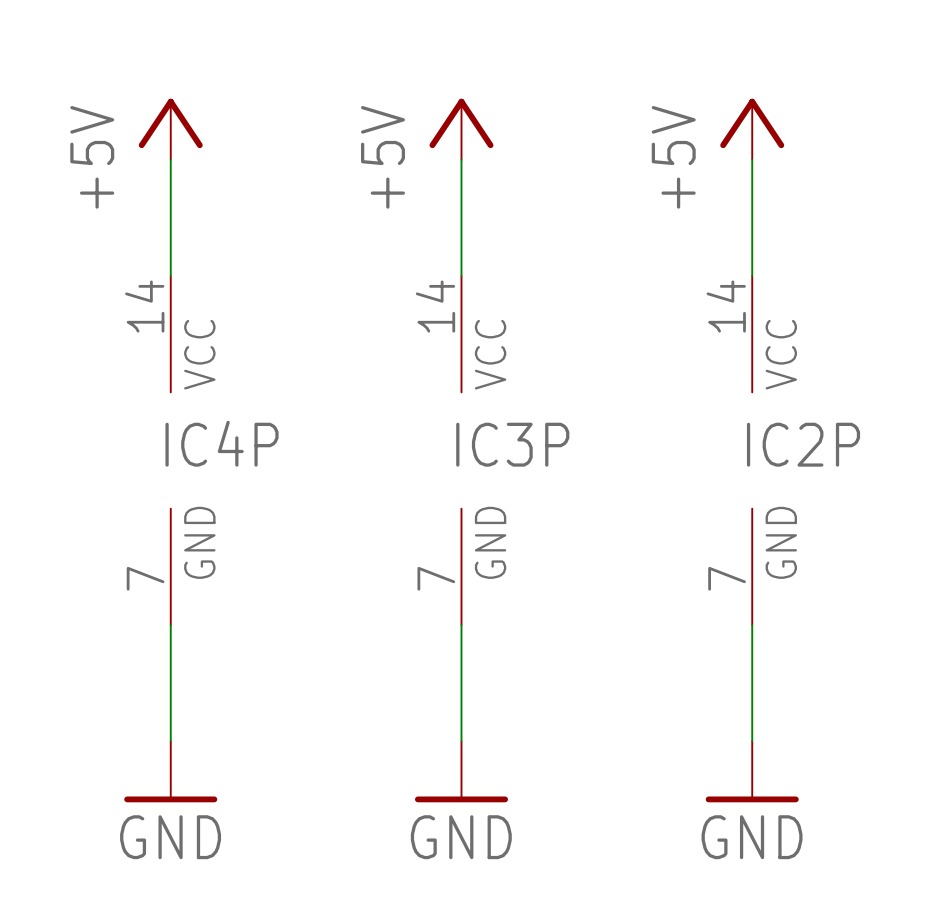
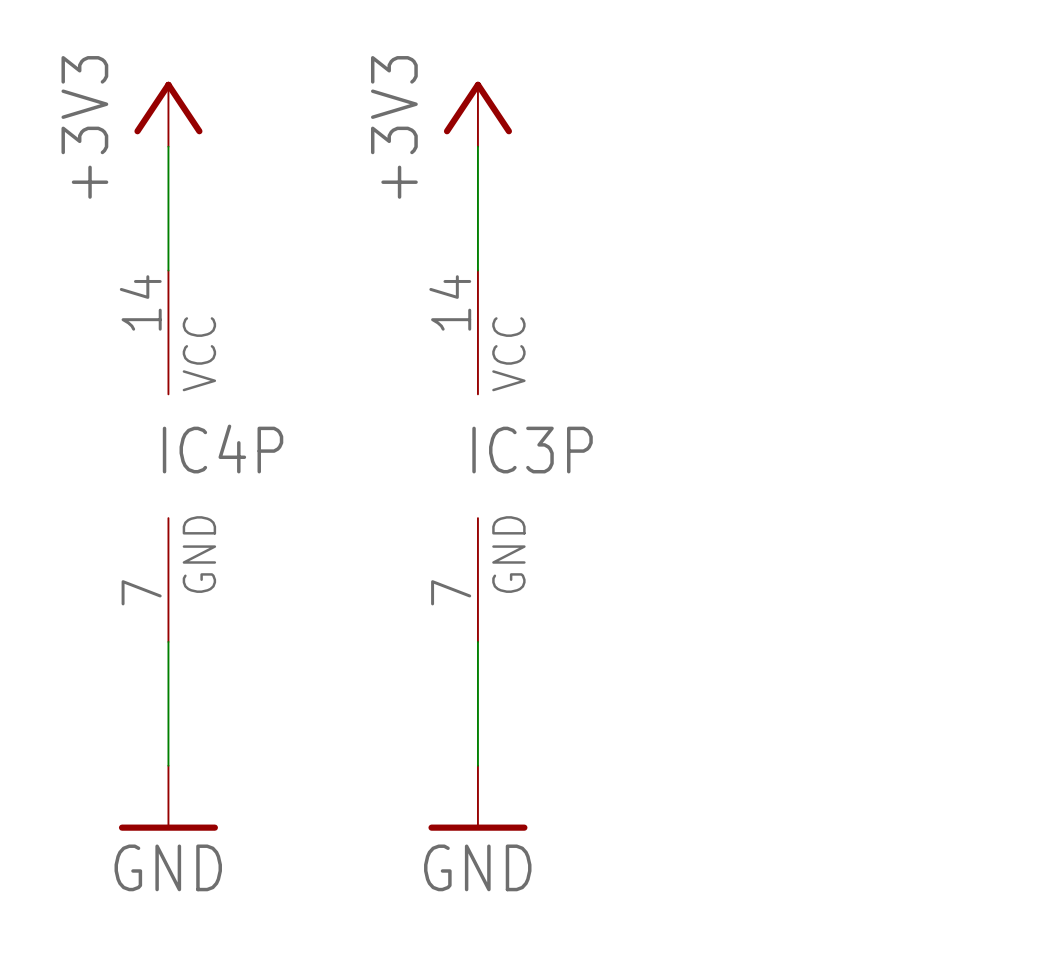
power symbol: +5V (170, 129) -> +3V3 (168, 114)
power symbol: +5V (461, 129) -> +3V3 (477, 114)
power symbol: +5V (752, 129) -> none
wire: (752, 159) (752, 276) -> none
IC2P: (752, 450) -> none
wire: (752, 624) (752, 741) -> none
power symbol: GND (752, 771) -> none

